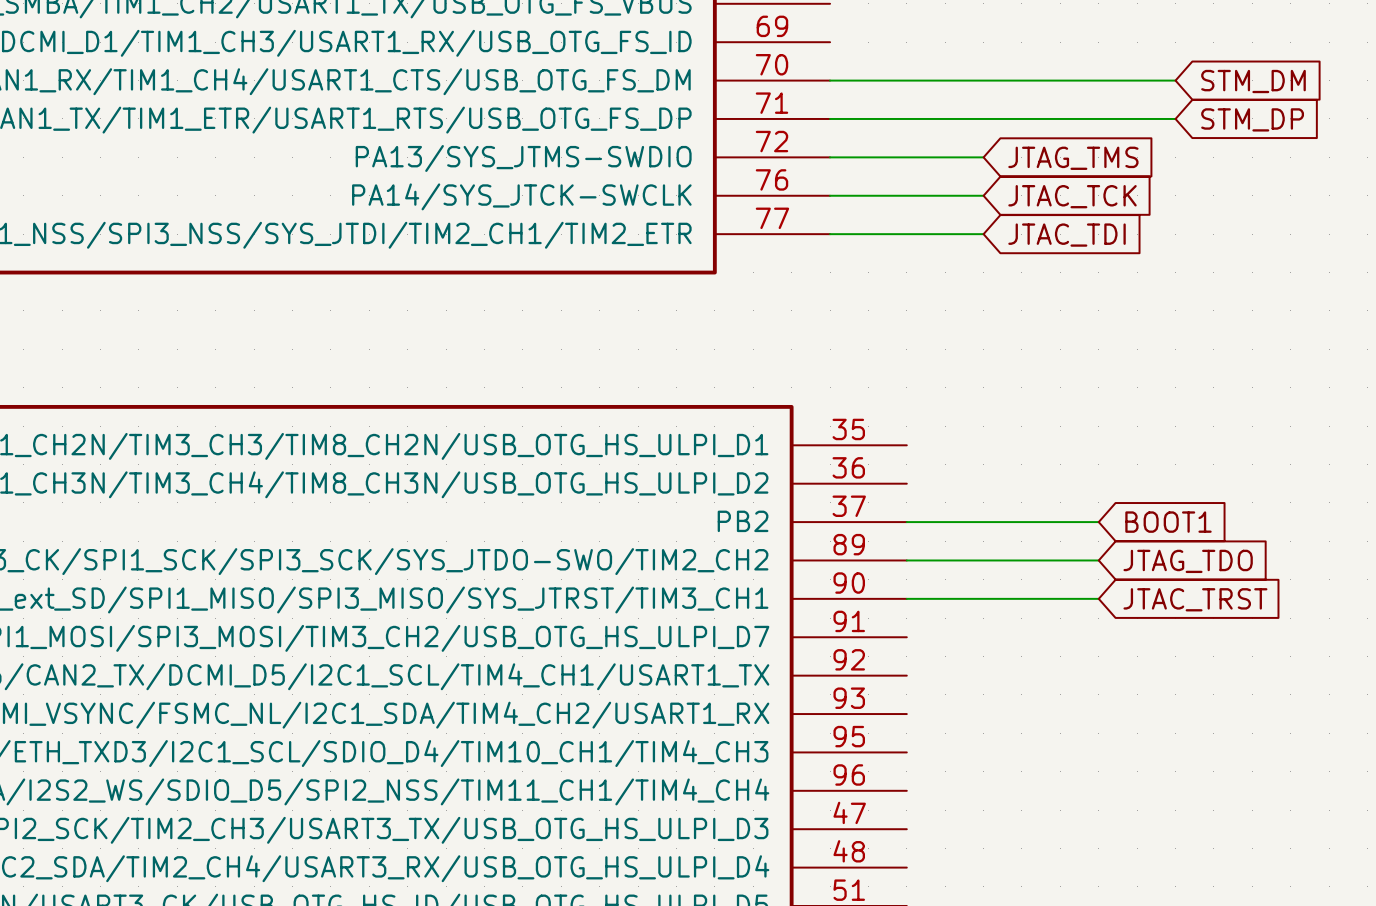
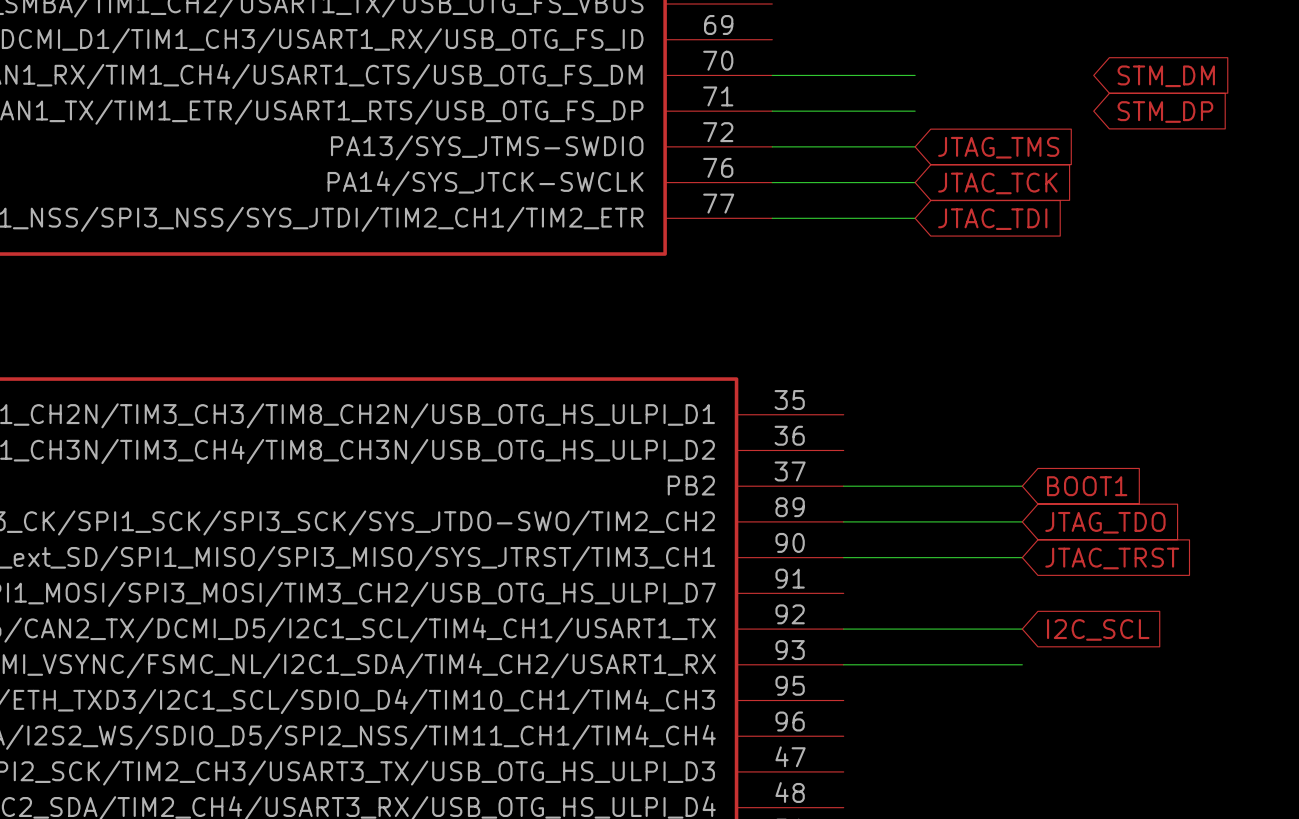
wire: (983, 80) (1175, 80) -> none
wire: (983, 118) (1175, 118) -> none
wire: none -> (843, 629) (1022, 629)
global label: none -> I2C_SCL (1098, 629)
wire: none -> (843, 664) (1022, 664)

